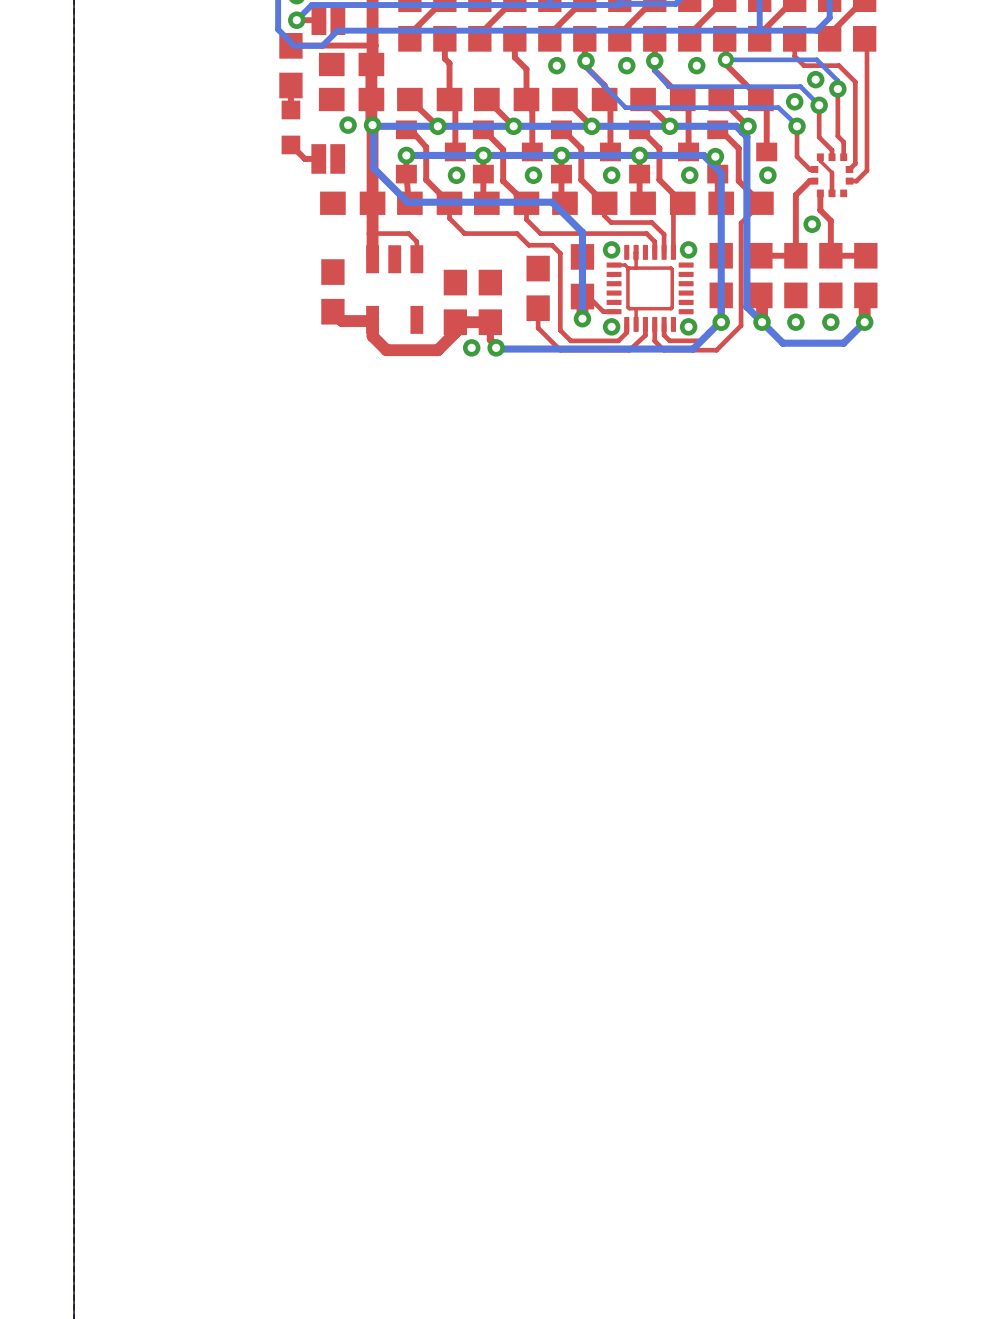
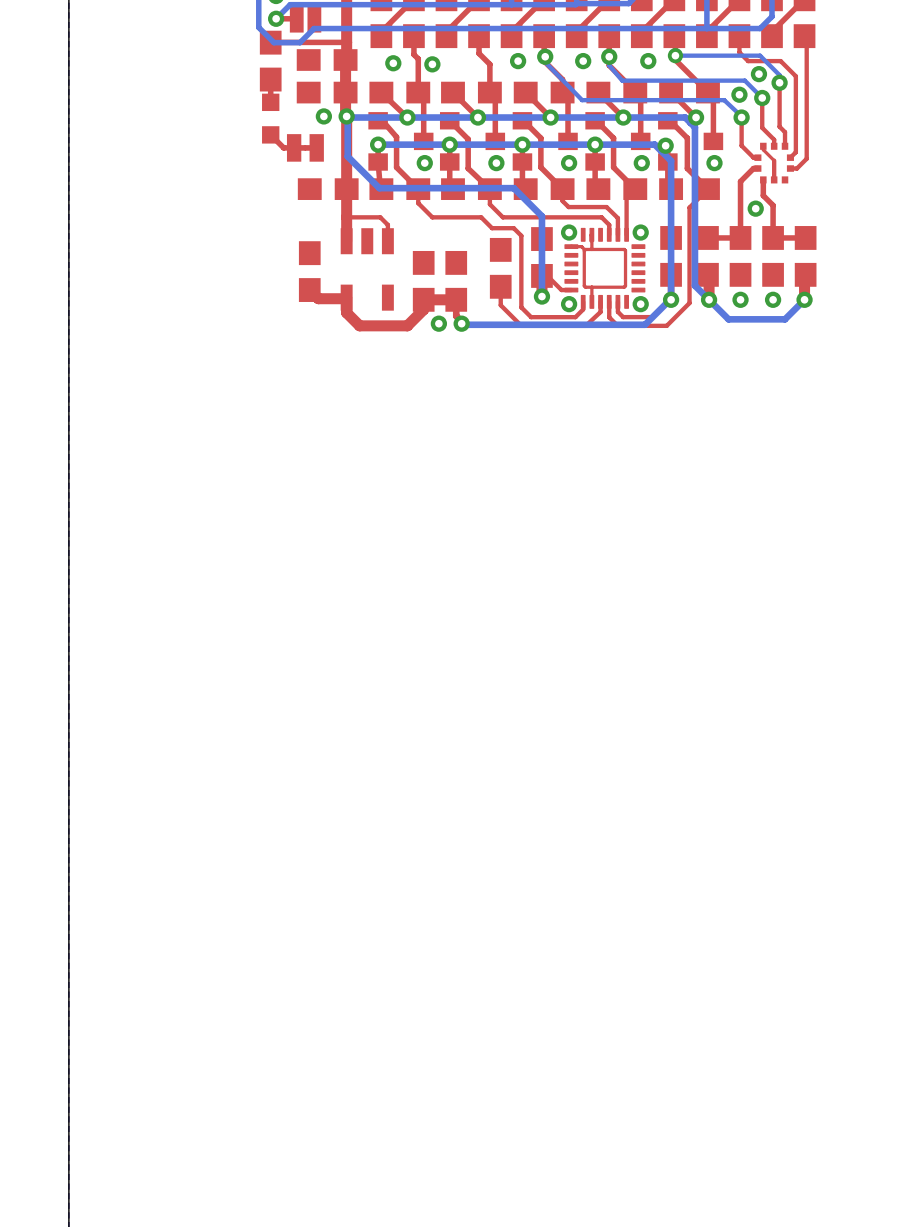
via: none -> (393, 63)
via: none -> (432, 64)
part footprint: [311, 144, 346, 174] -> [286, 134, 324, 162]

